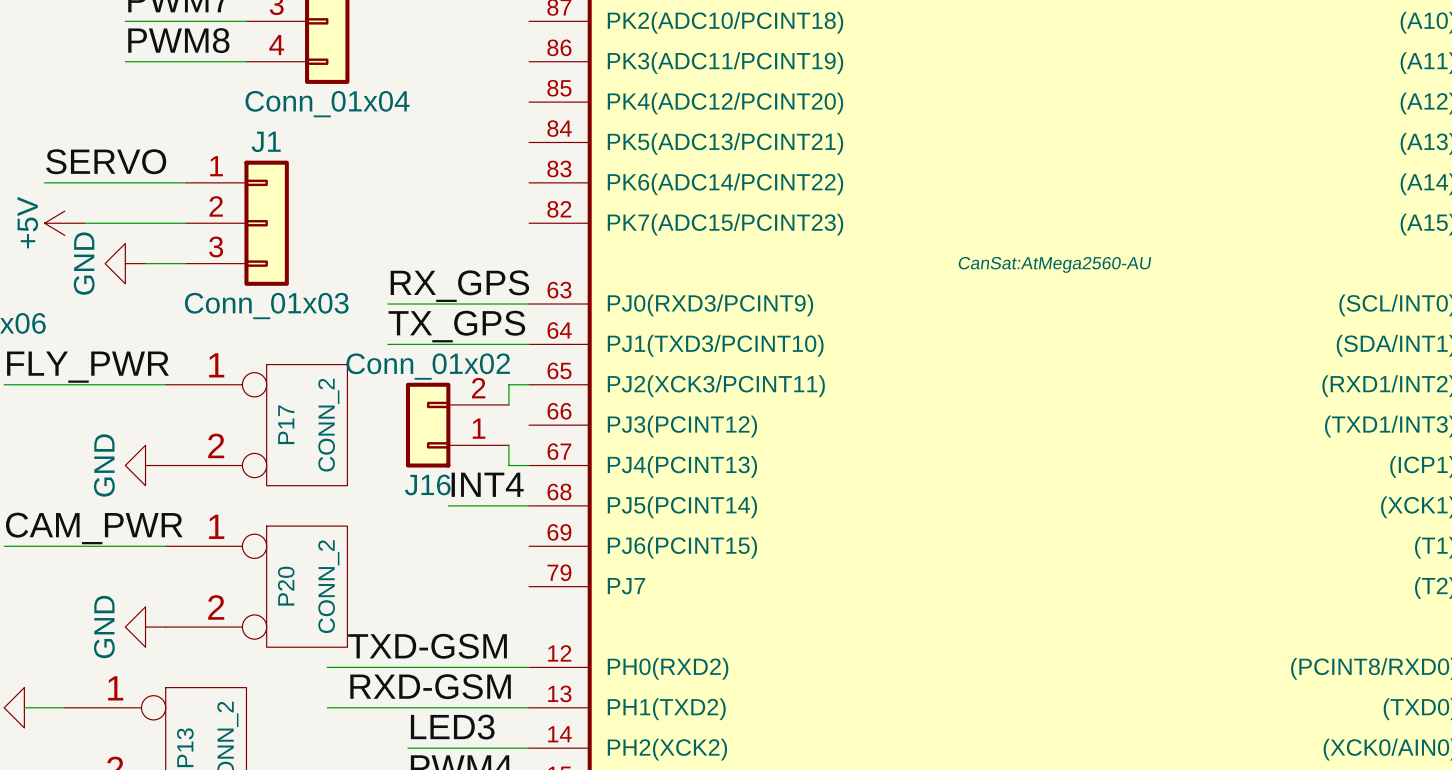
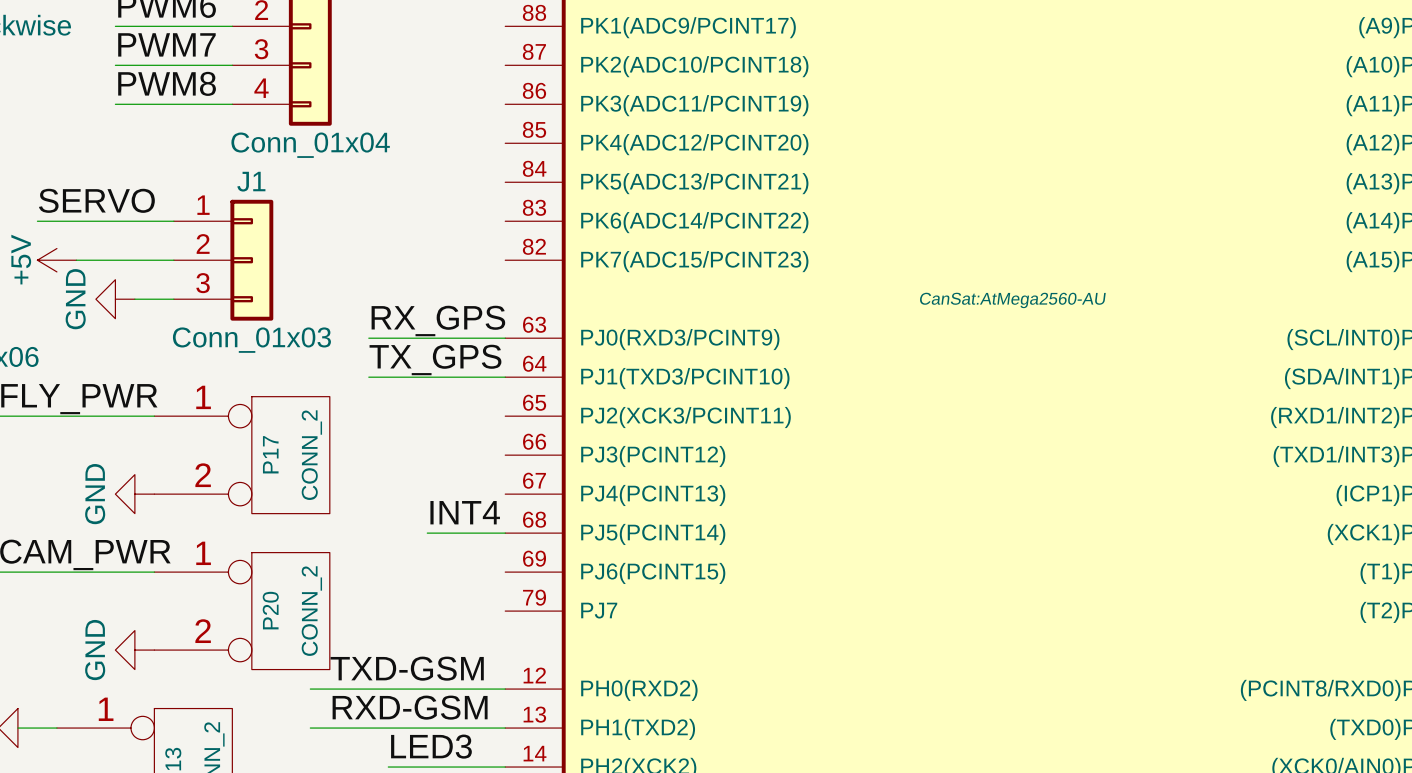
wire: (529, 384) (508, 384) (508, 404) -> none
J16: Conn_01x02 (457, 425) -> none
wire: (508, 445) (508, 465) (529, 465) -> none

